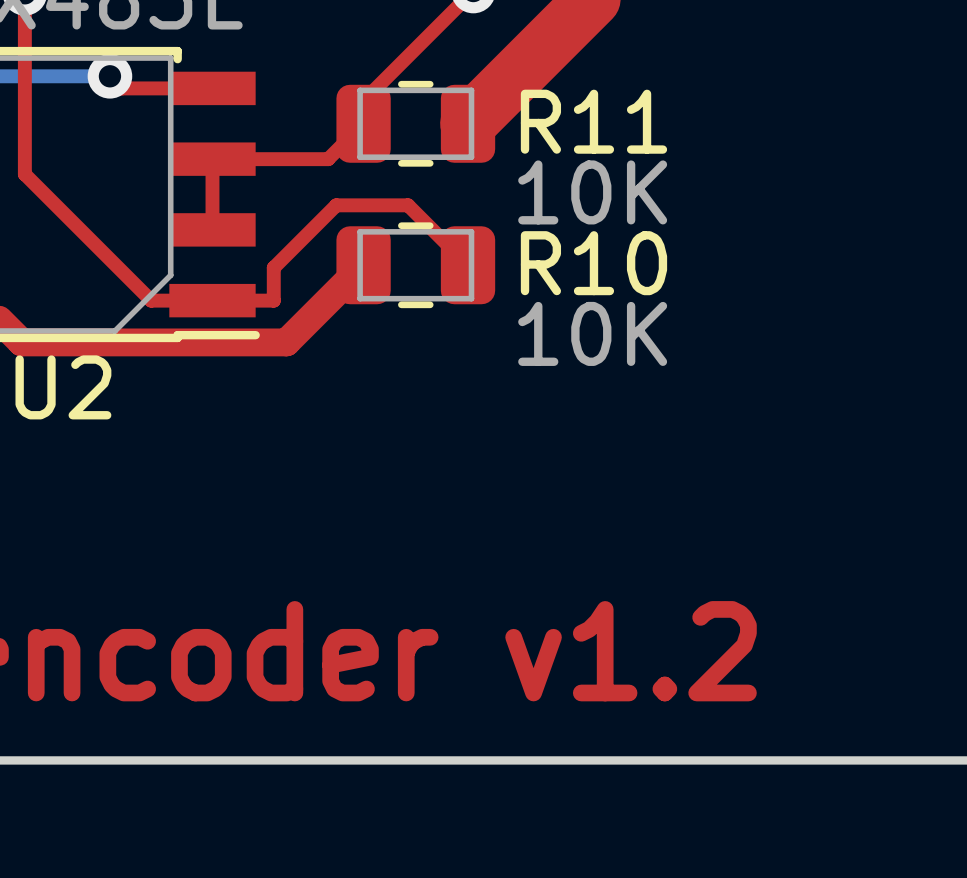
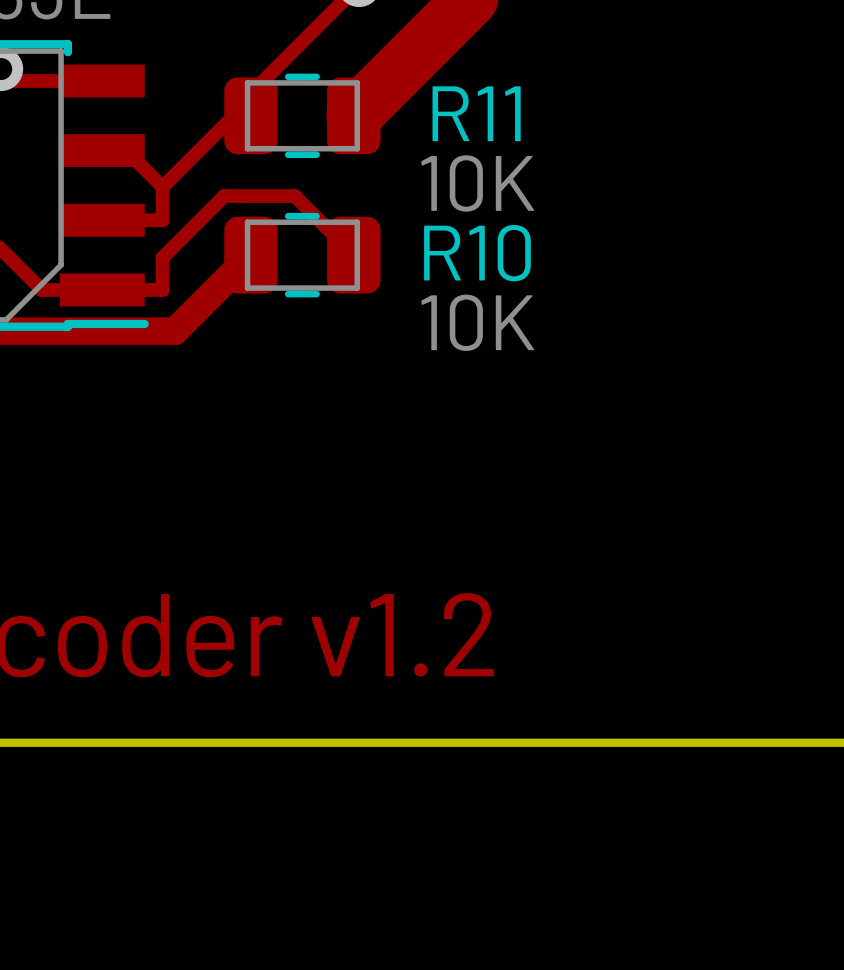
top track: none -> (233, 115) (162, 187)
top track: (363, 123) (328, 159) (236, 159) -> (162, 187) (126, 150)
top track: (212, 159) (212, 229) -> (162, 187) (162, 220) (102, 220)

